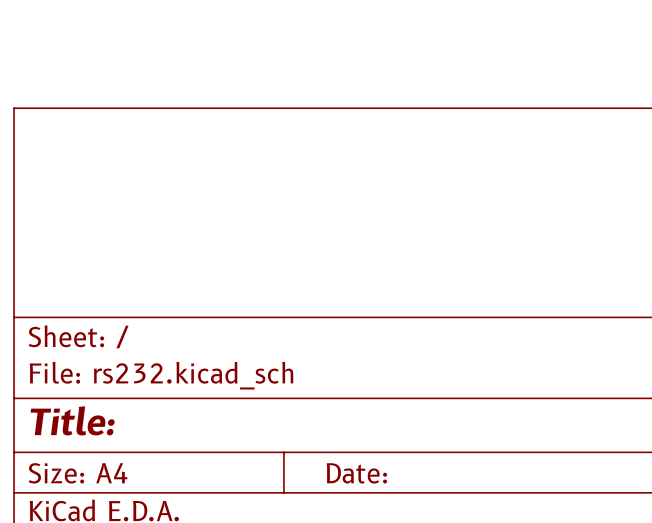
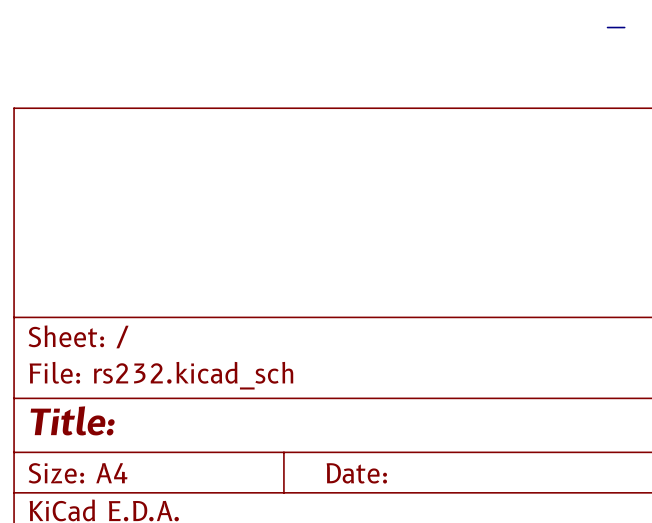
line: none -> (607, 27) (624, 27)

